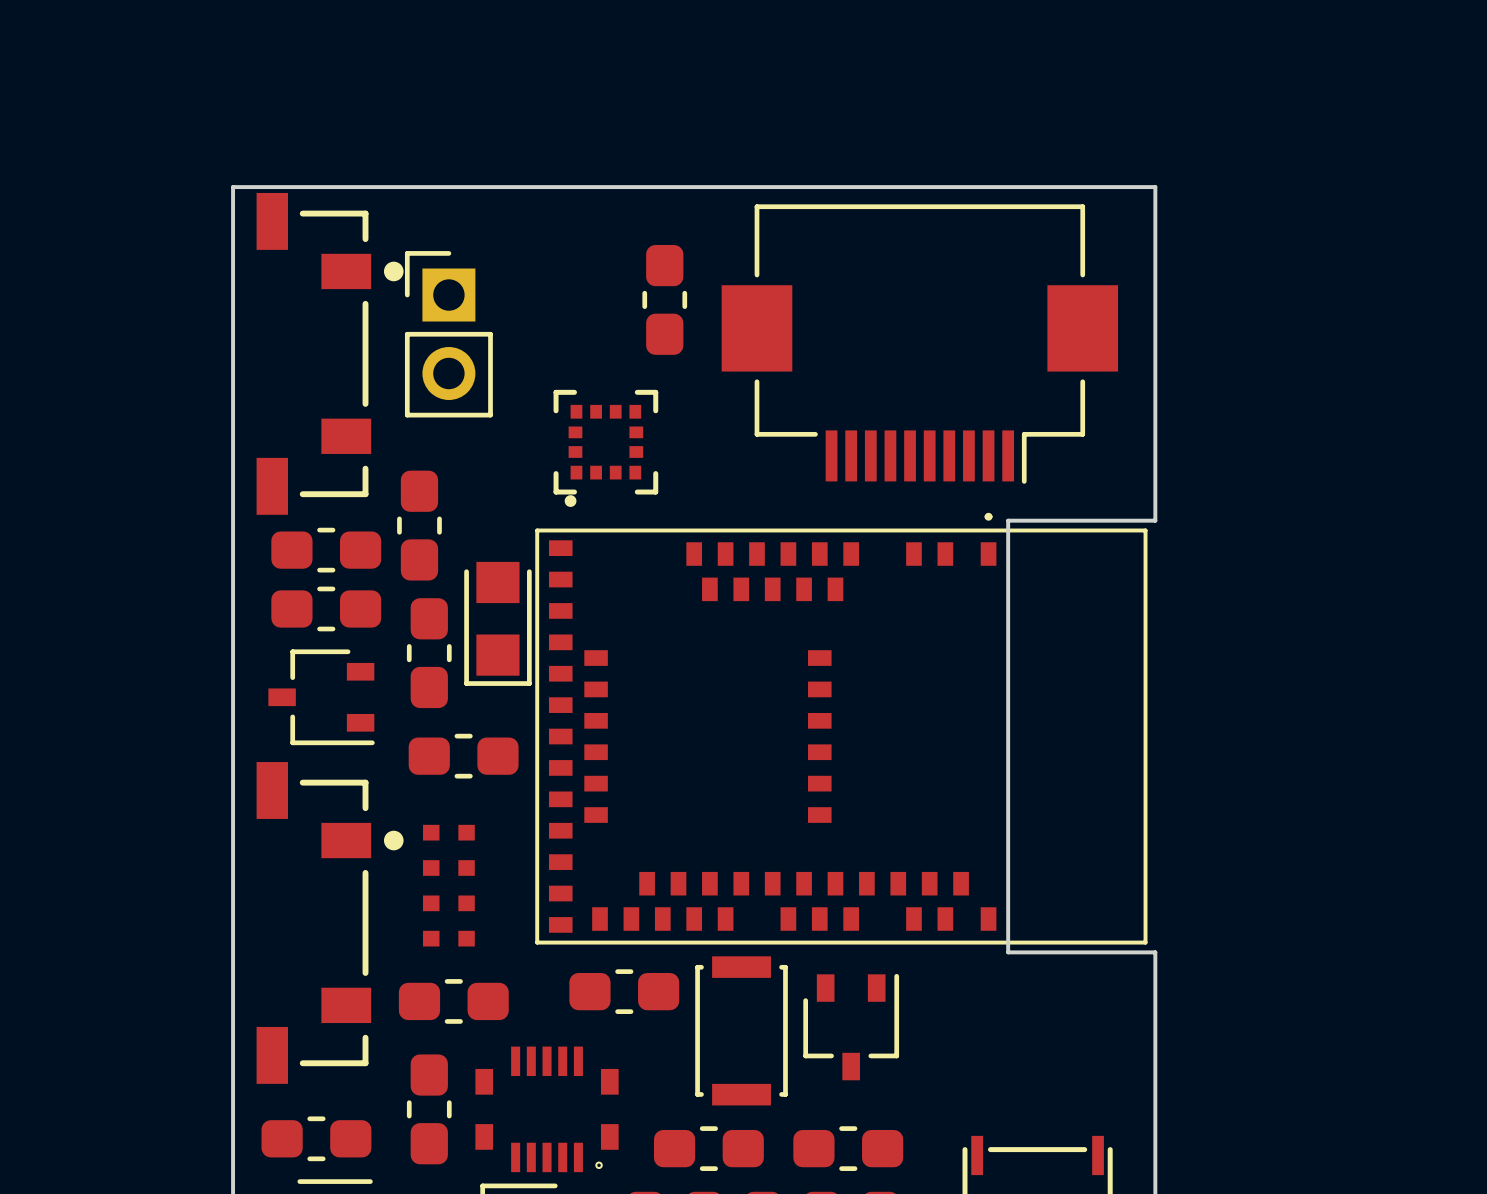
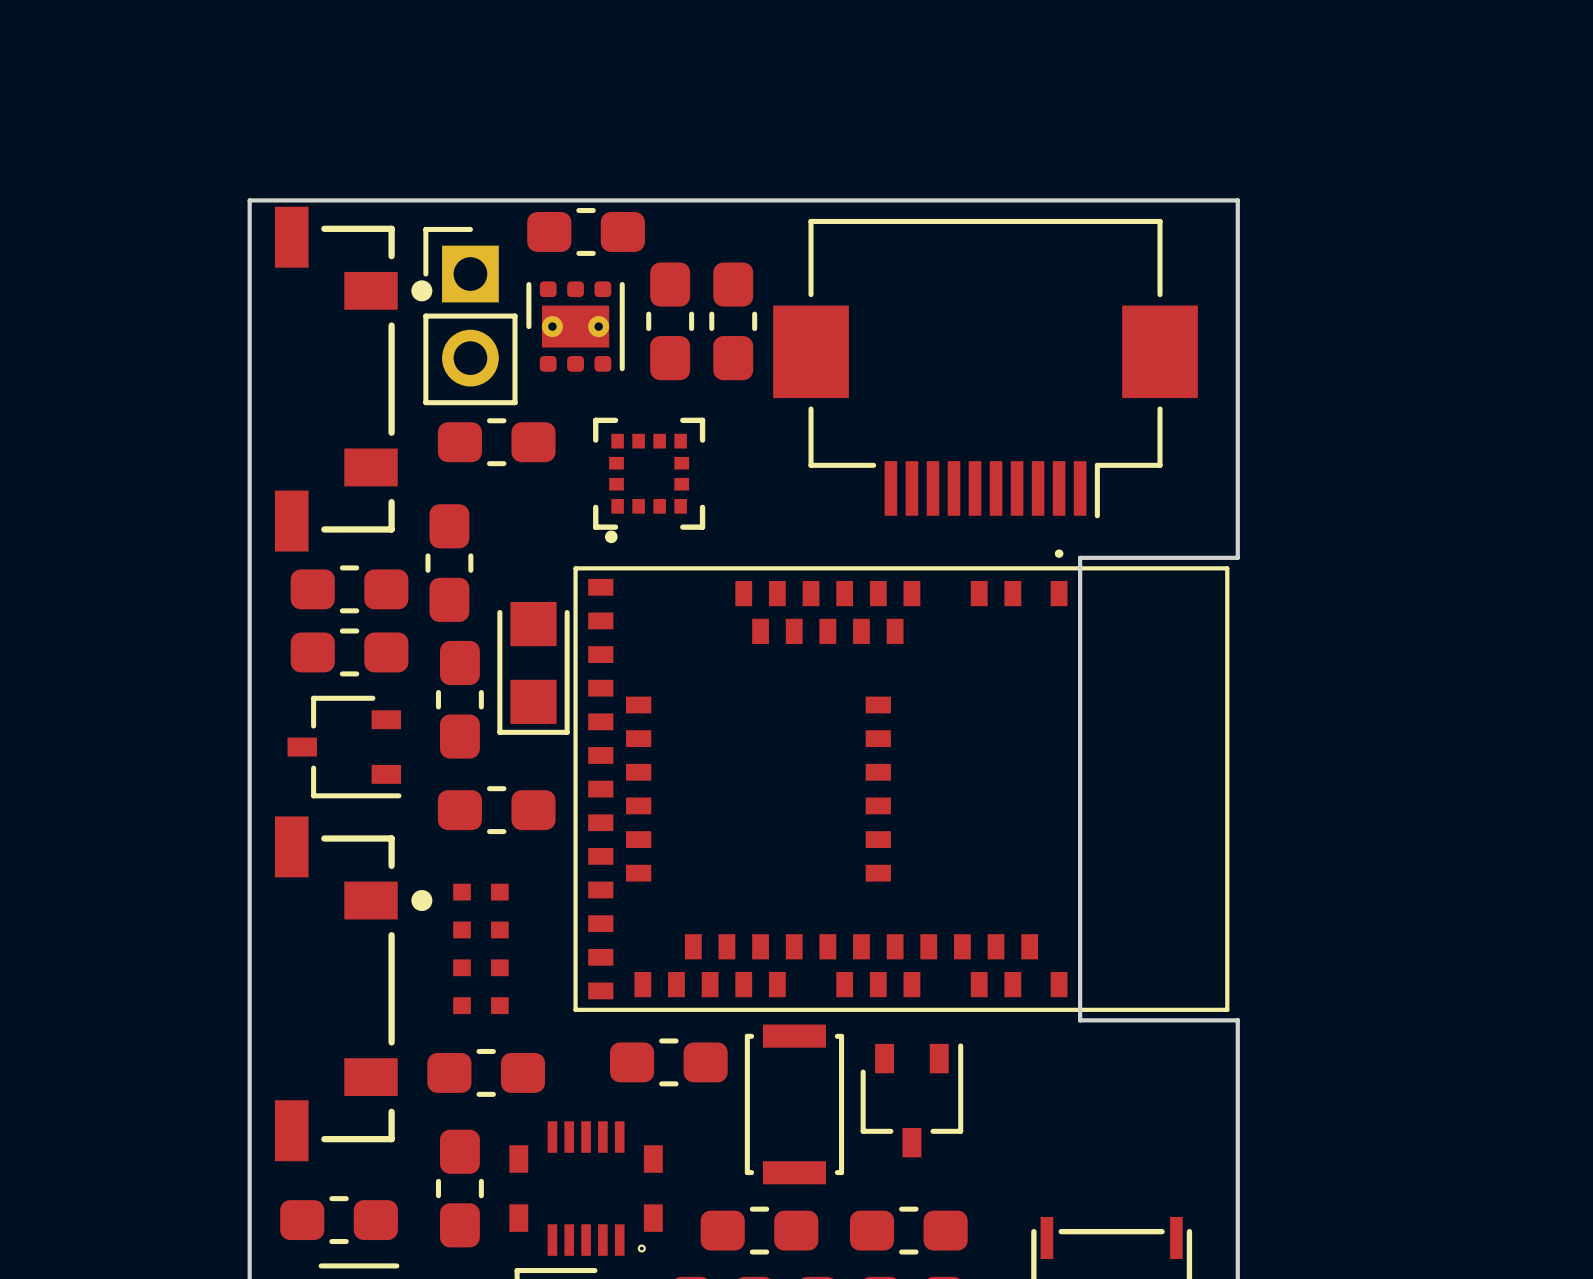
part: none -> (586, 231)
part: none -> (670, 321)
part: (664, 299) -> none
part: none -> (733, 321)
part: none -> (575, 326)
part position: (448, 334) -> (470, 316)
part: none -> (496, 442)

